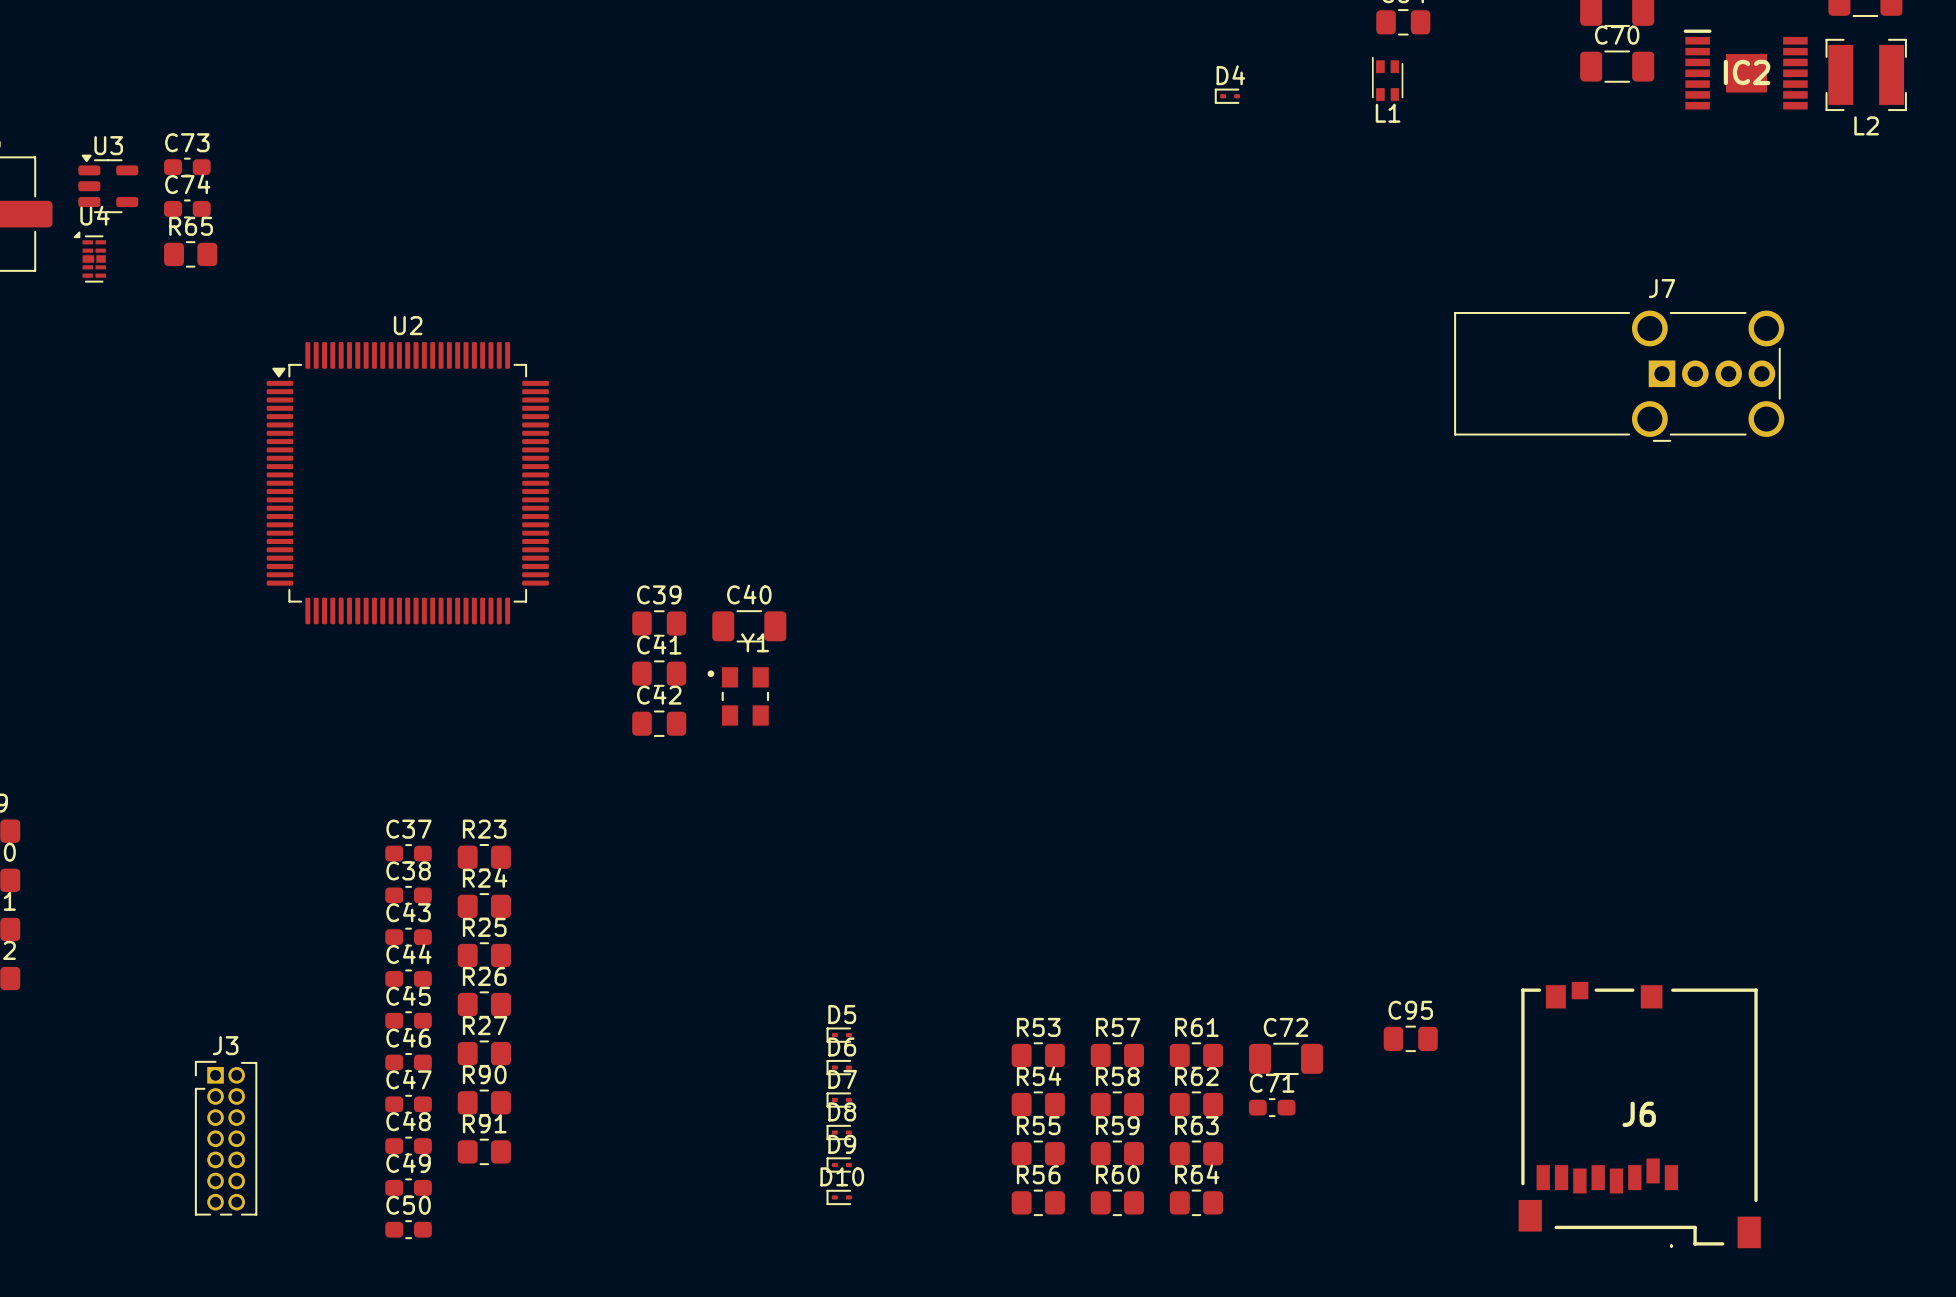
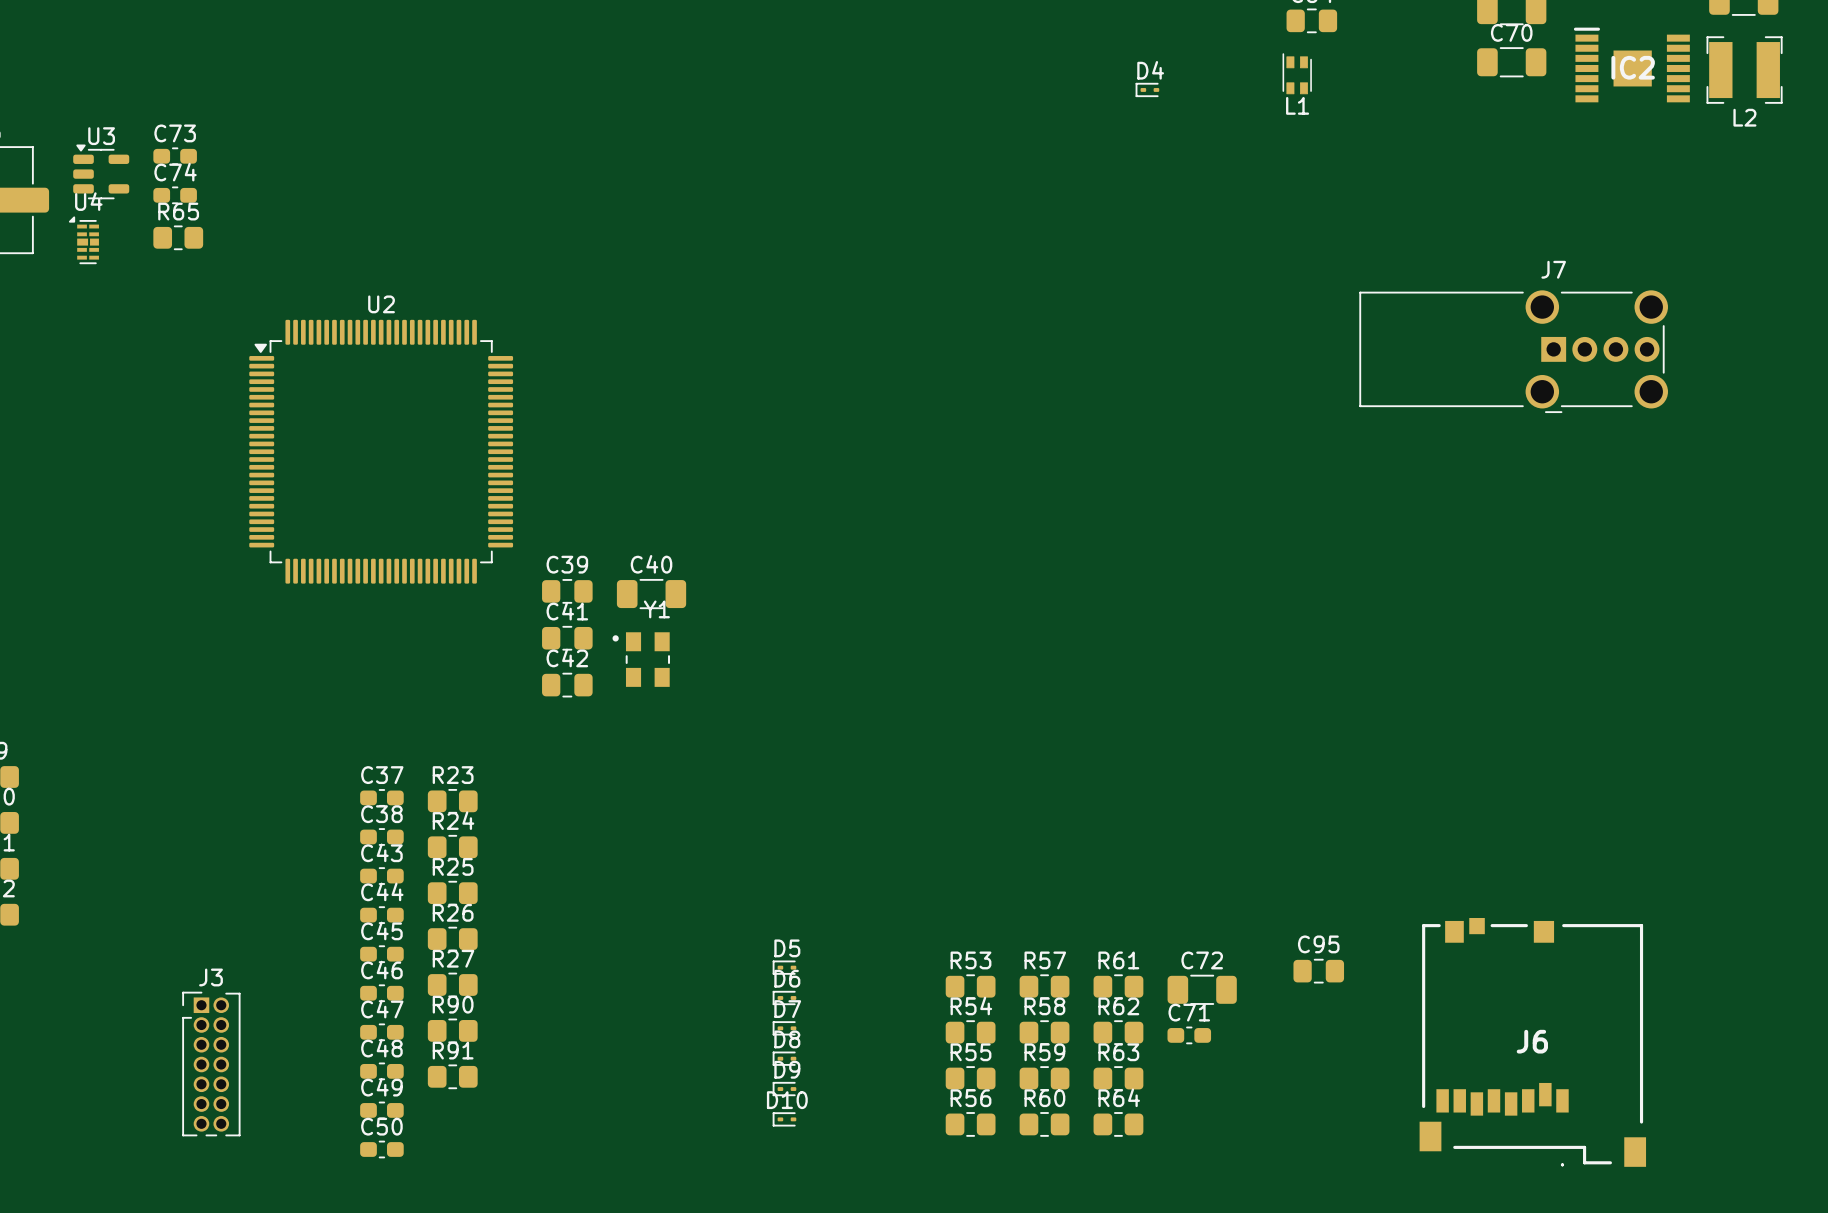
C39 position: (659, 623) -> (567, 591)
C40 position: (749, 626) -> (651, 594)
C41 position: (659, 673) -> (567, 638)
Y1 position: (738, 696) -> (641, 659)
C42 position: (659, 723) -> (567, 685)

